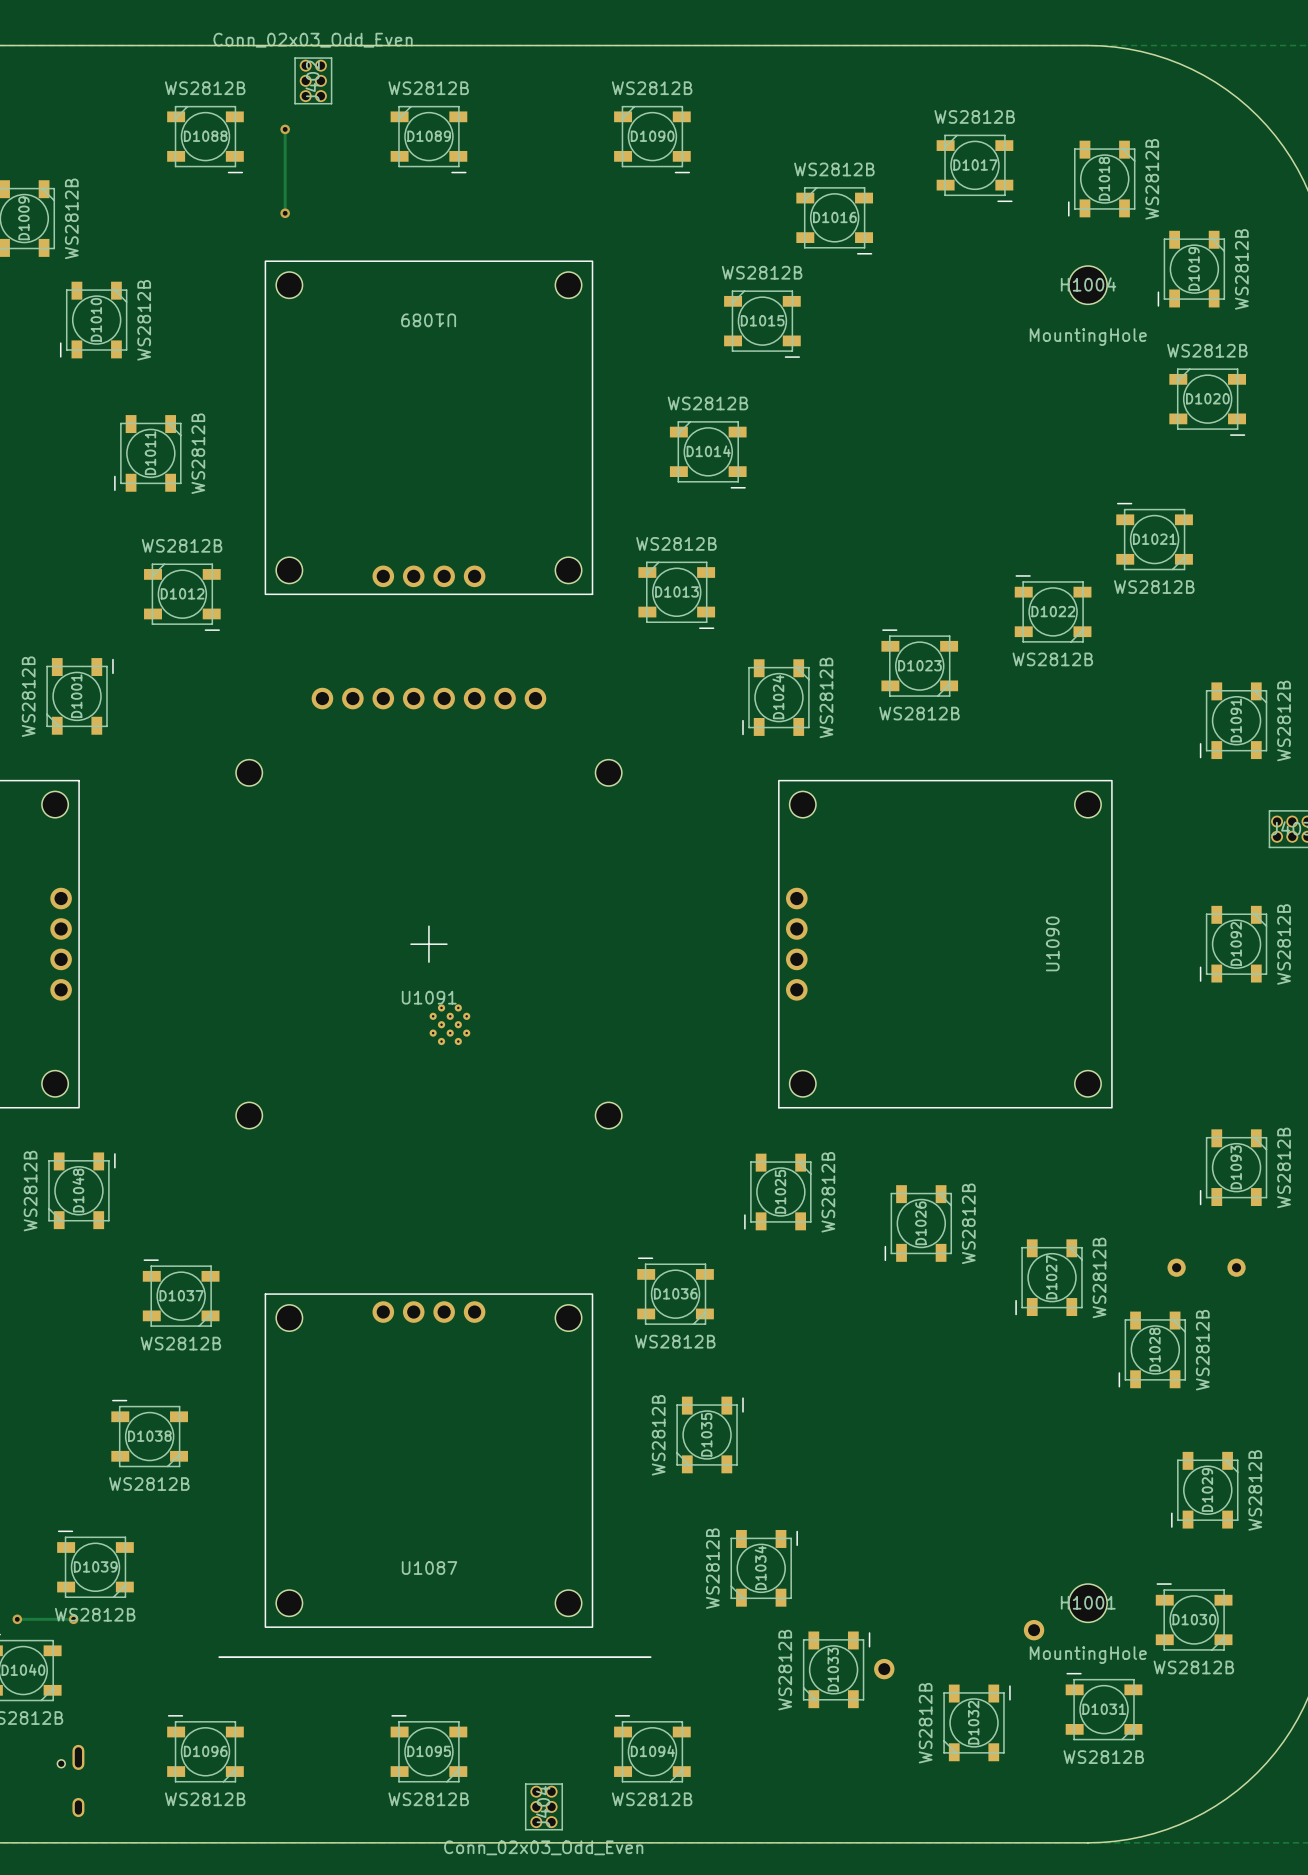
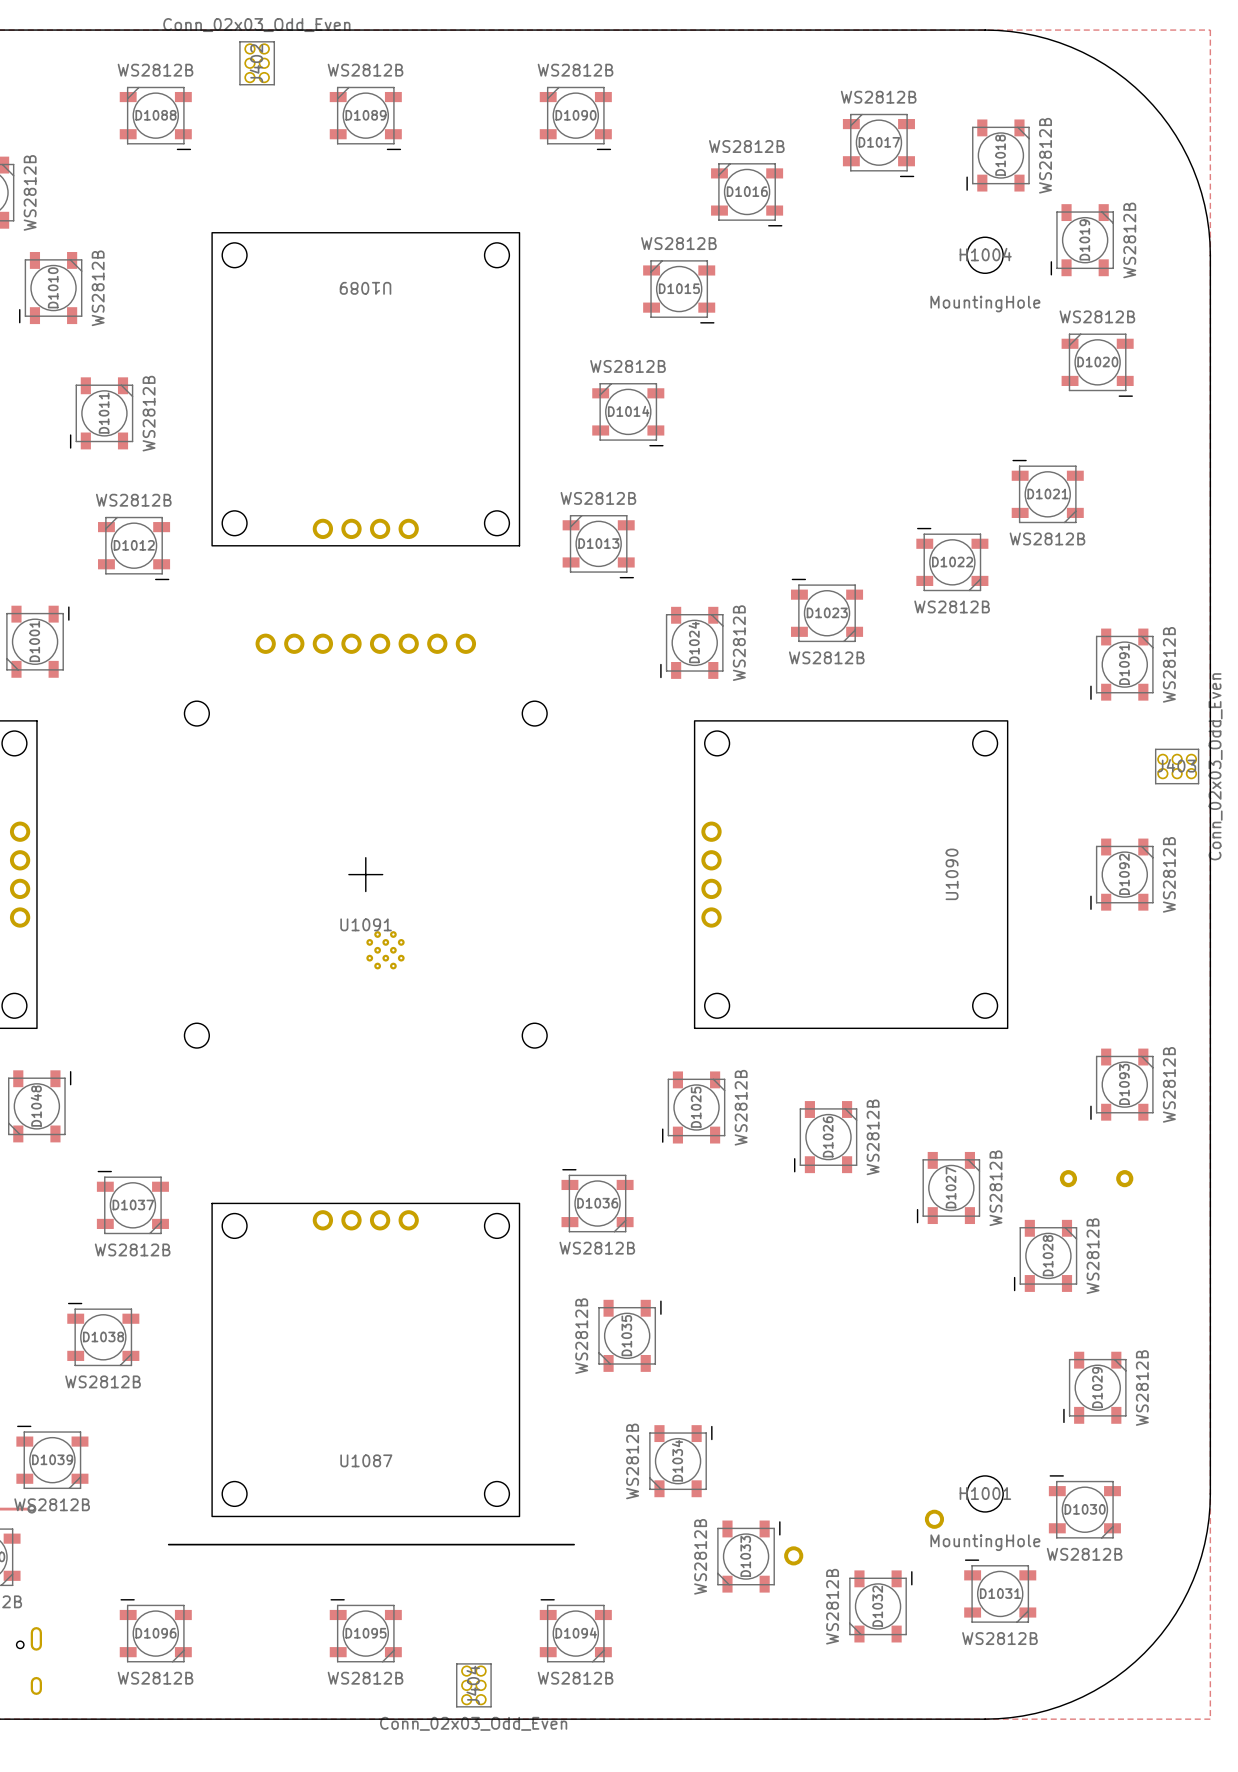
track: (285, 129) (285, 213) -> none
via: (285, 129) -> none
via: (285, 213) -> none

